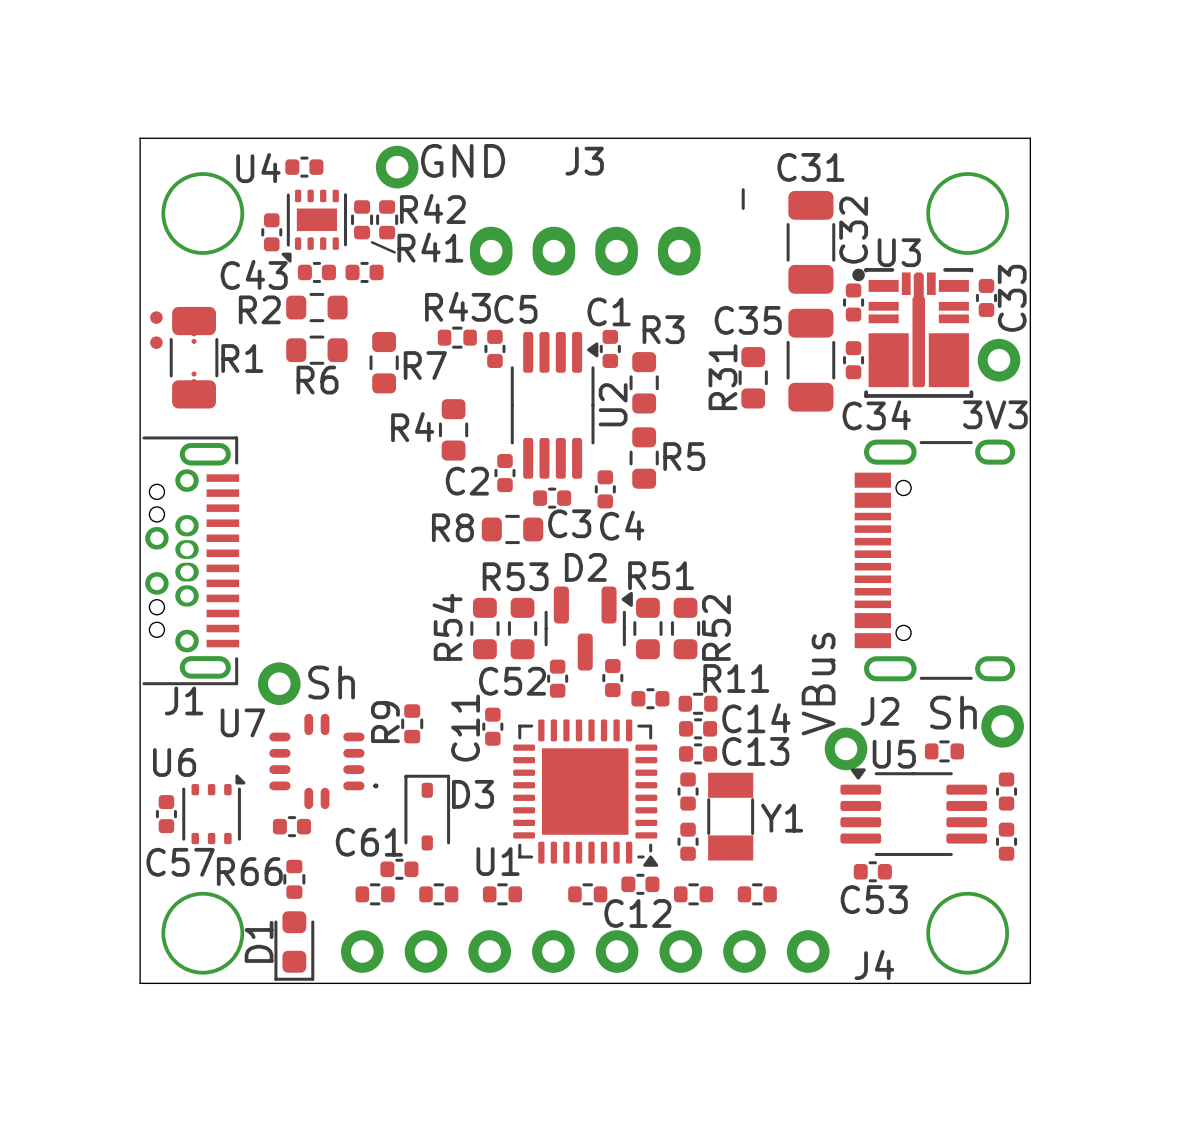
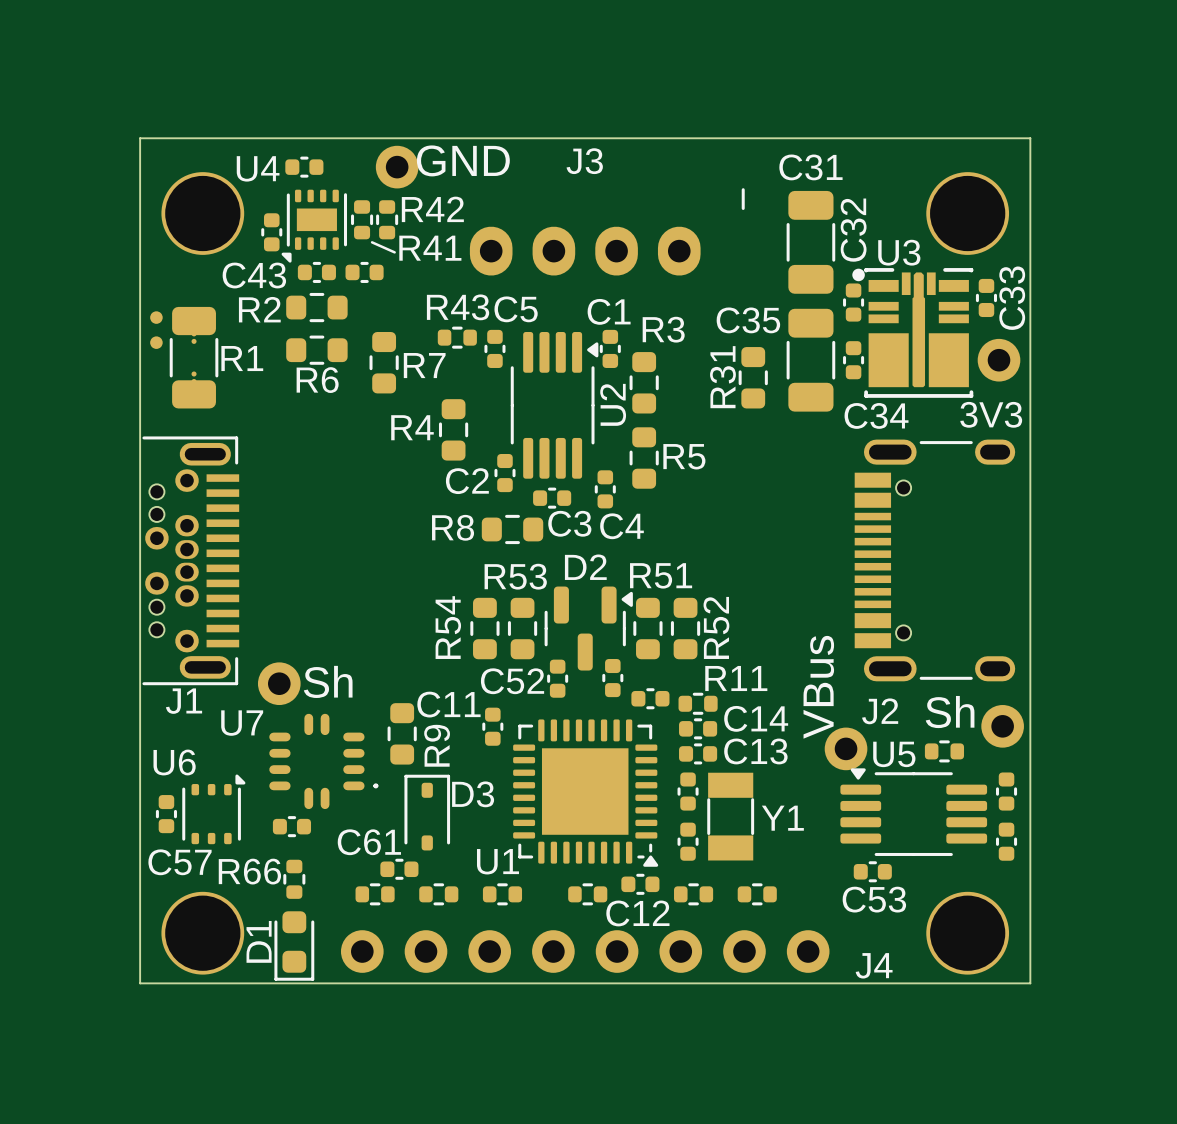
R9 footprint: [401, 704, 424, 744] -> [387, 703, 417, 765]
R9 name position: R9 (385, 722) -> R9 (437, 745)
C11 name rotation: 0° (465, 728) -> 90° clockwise (448, 704)

